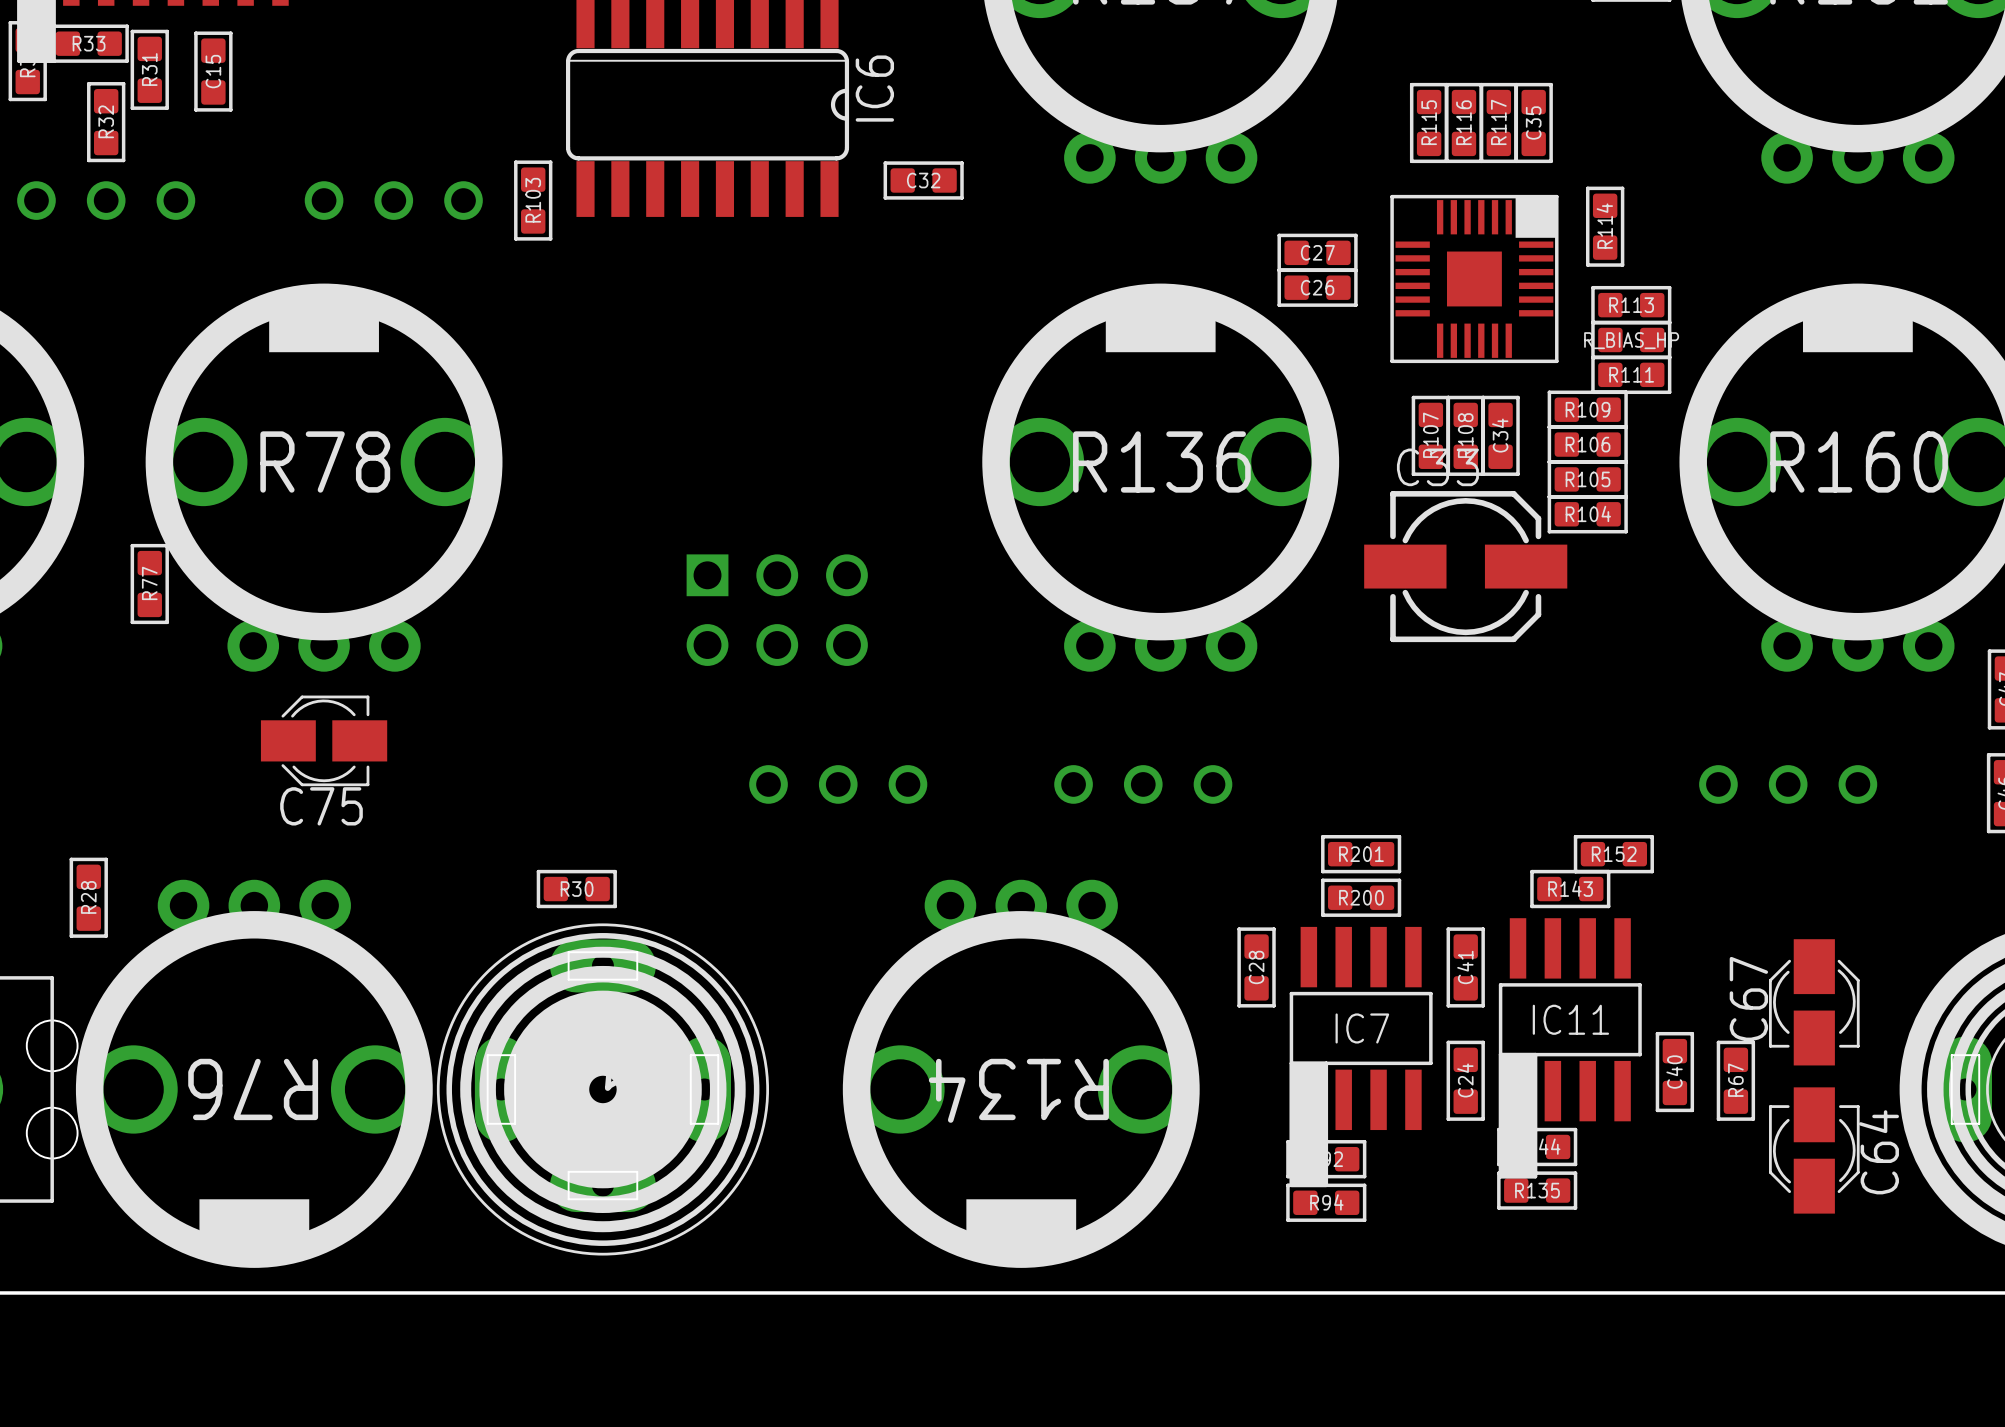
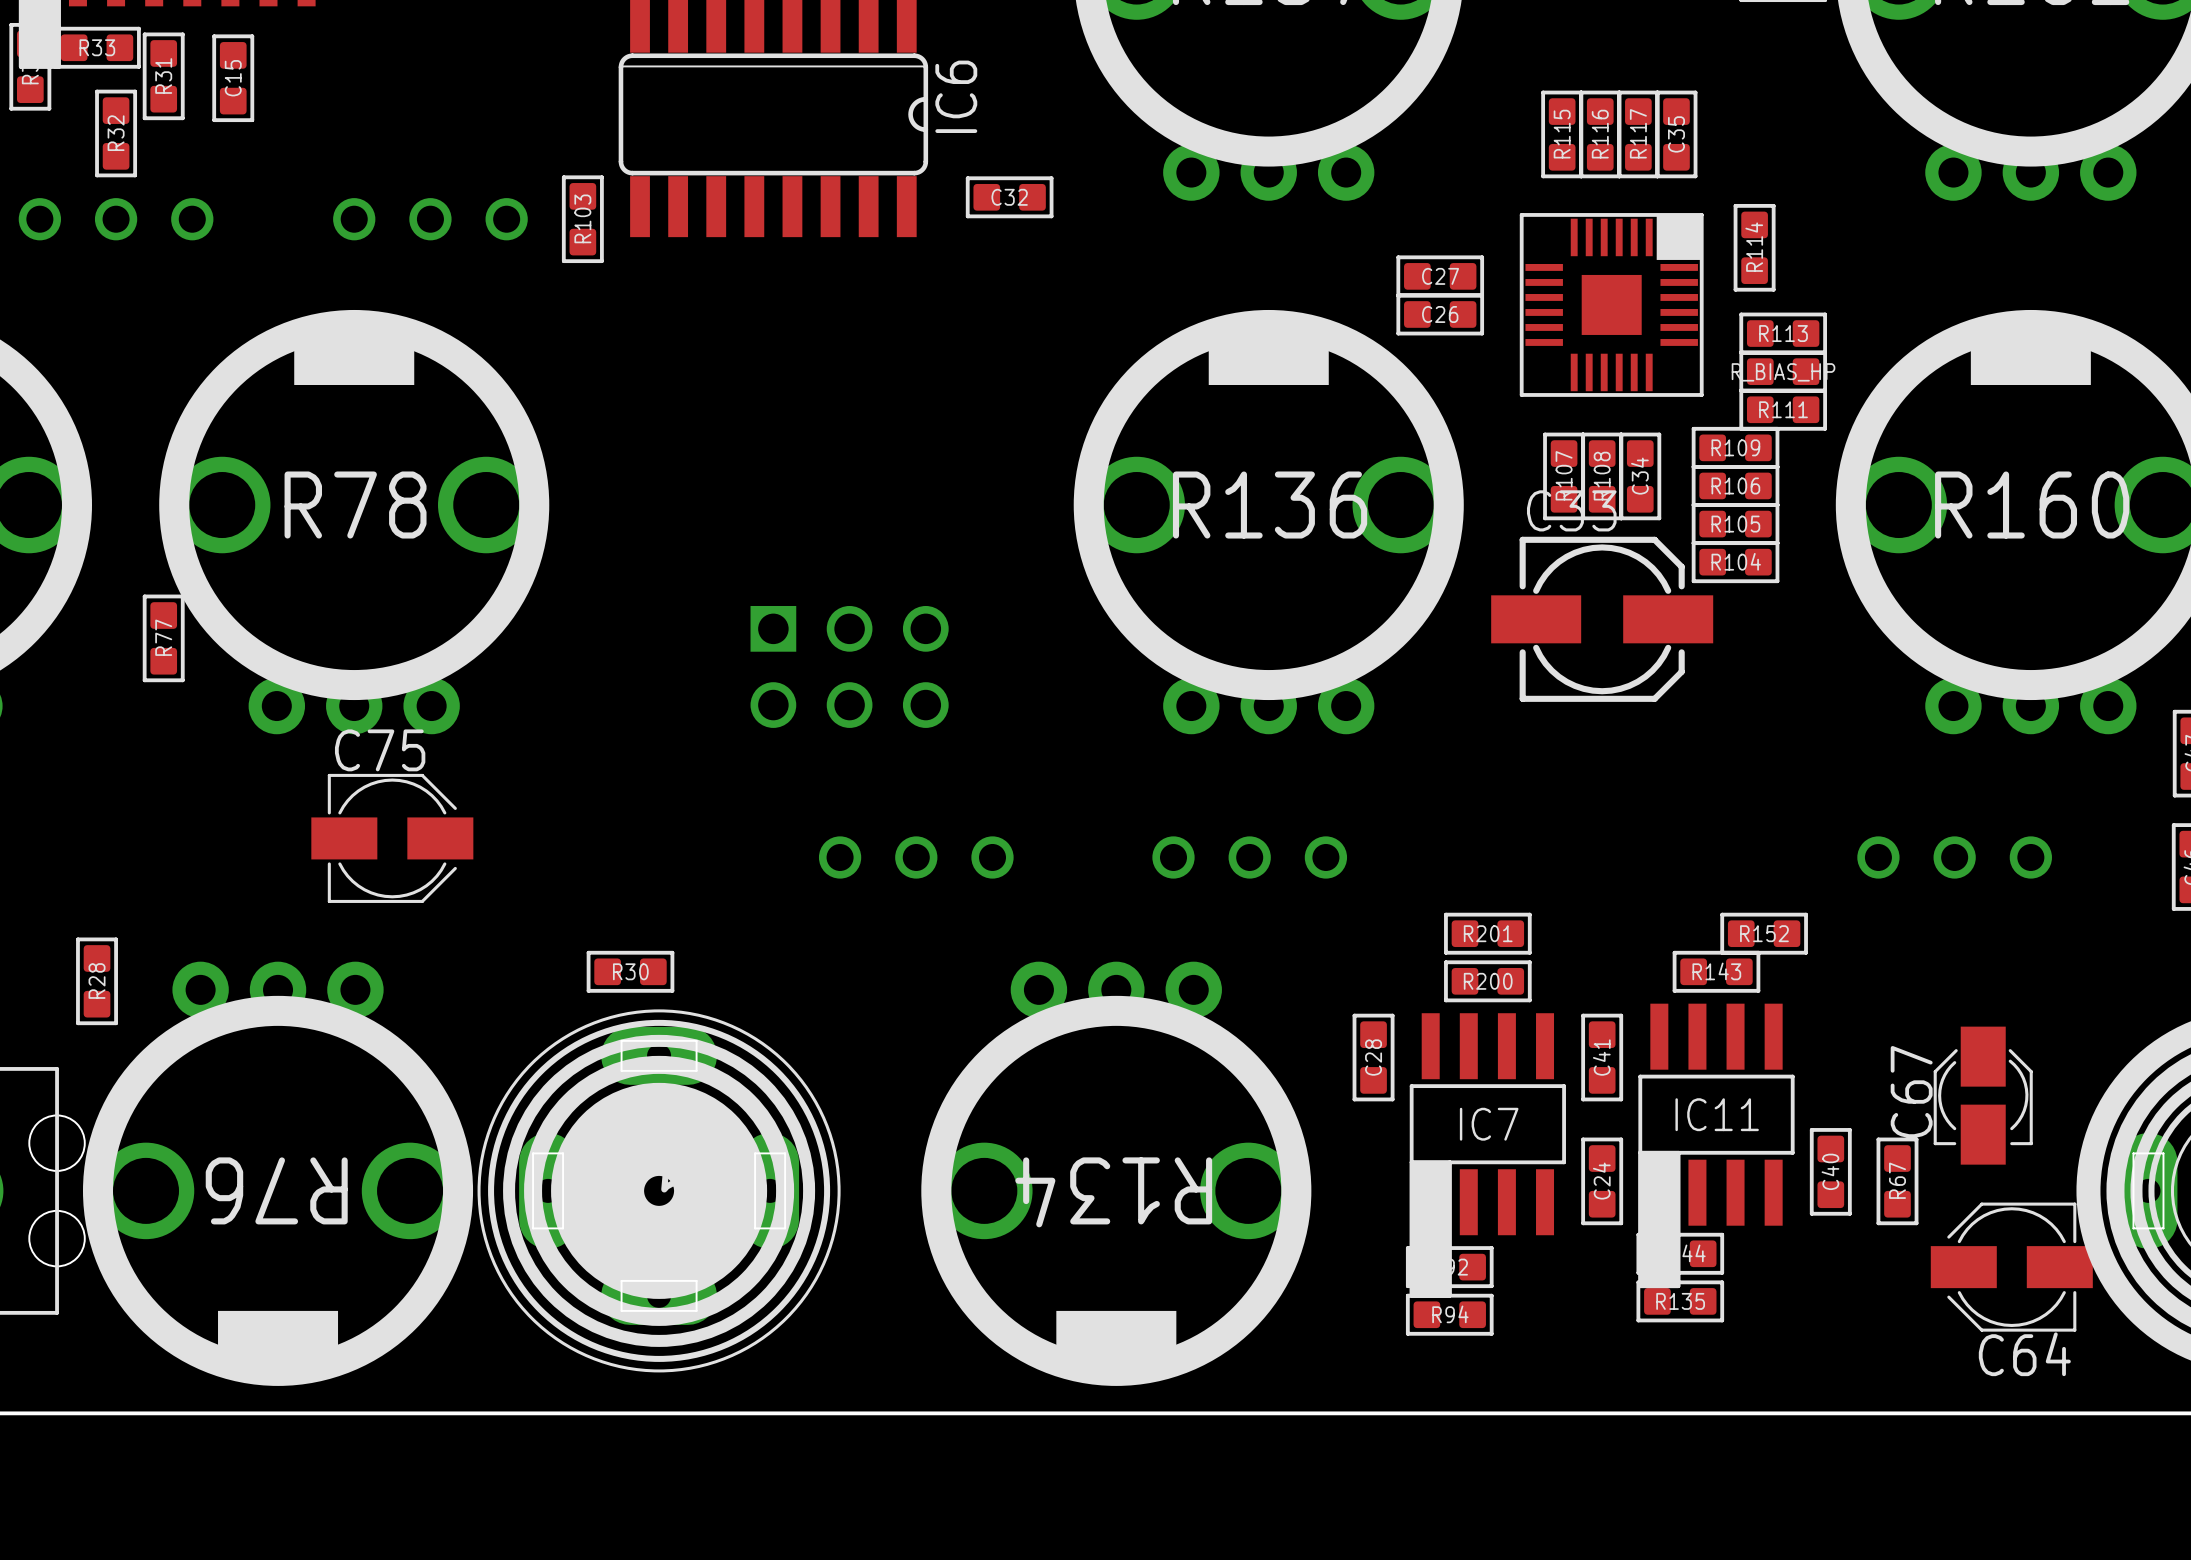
C75 footprint: [260, 695, 388, 787] -> [311, 773, 474, 903]
C75 name position: C75 (321, 806) -> C75 (380, 750)
C64 footprint: [1769, 1087, 1860, 1214] -> [1930, 1202, 2093, 1332]
C64 name position: C64 (1878, 1152) -> C64 (2024, 1354)

